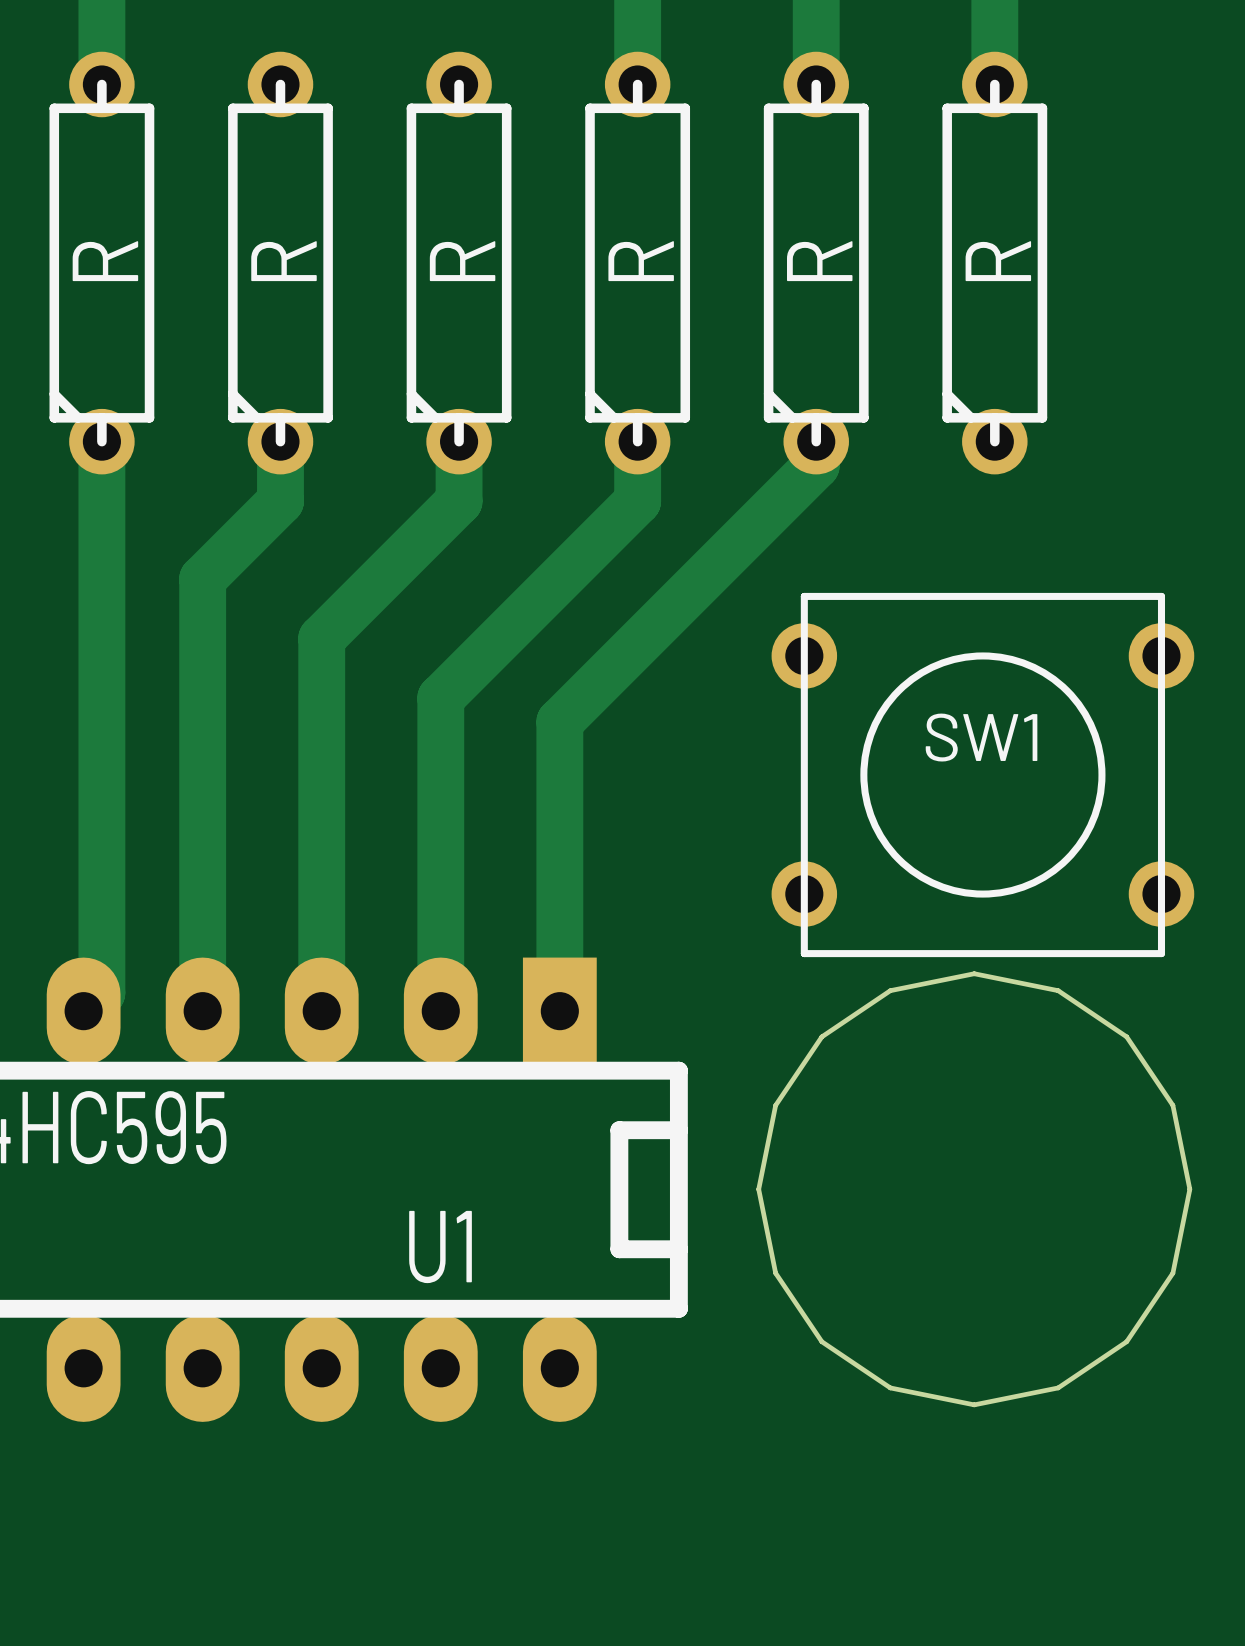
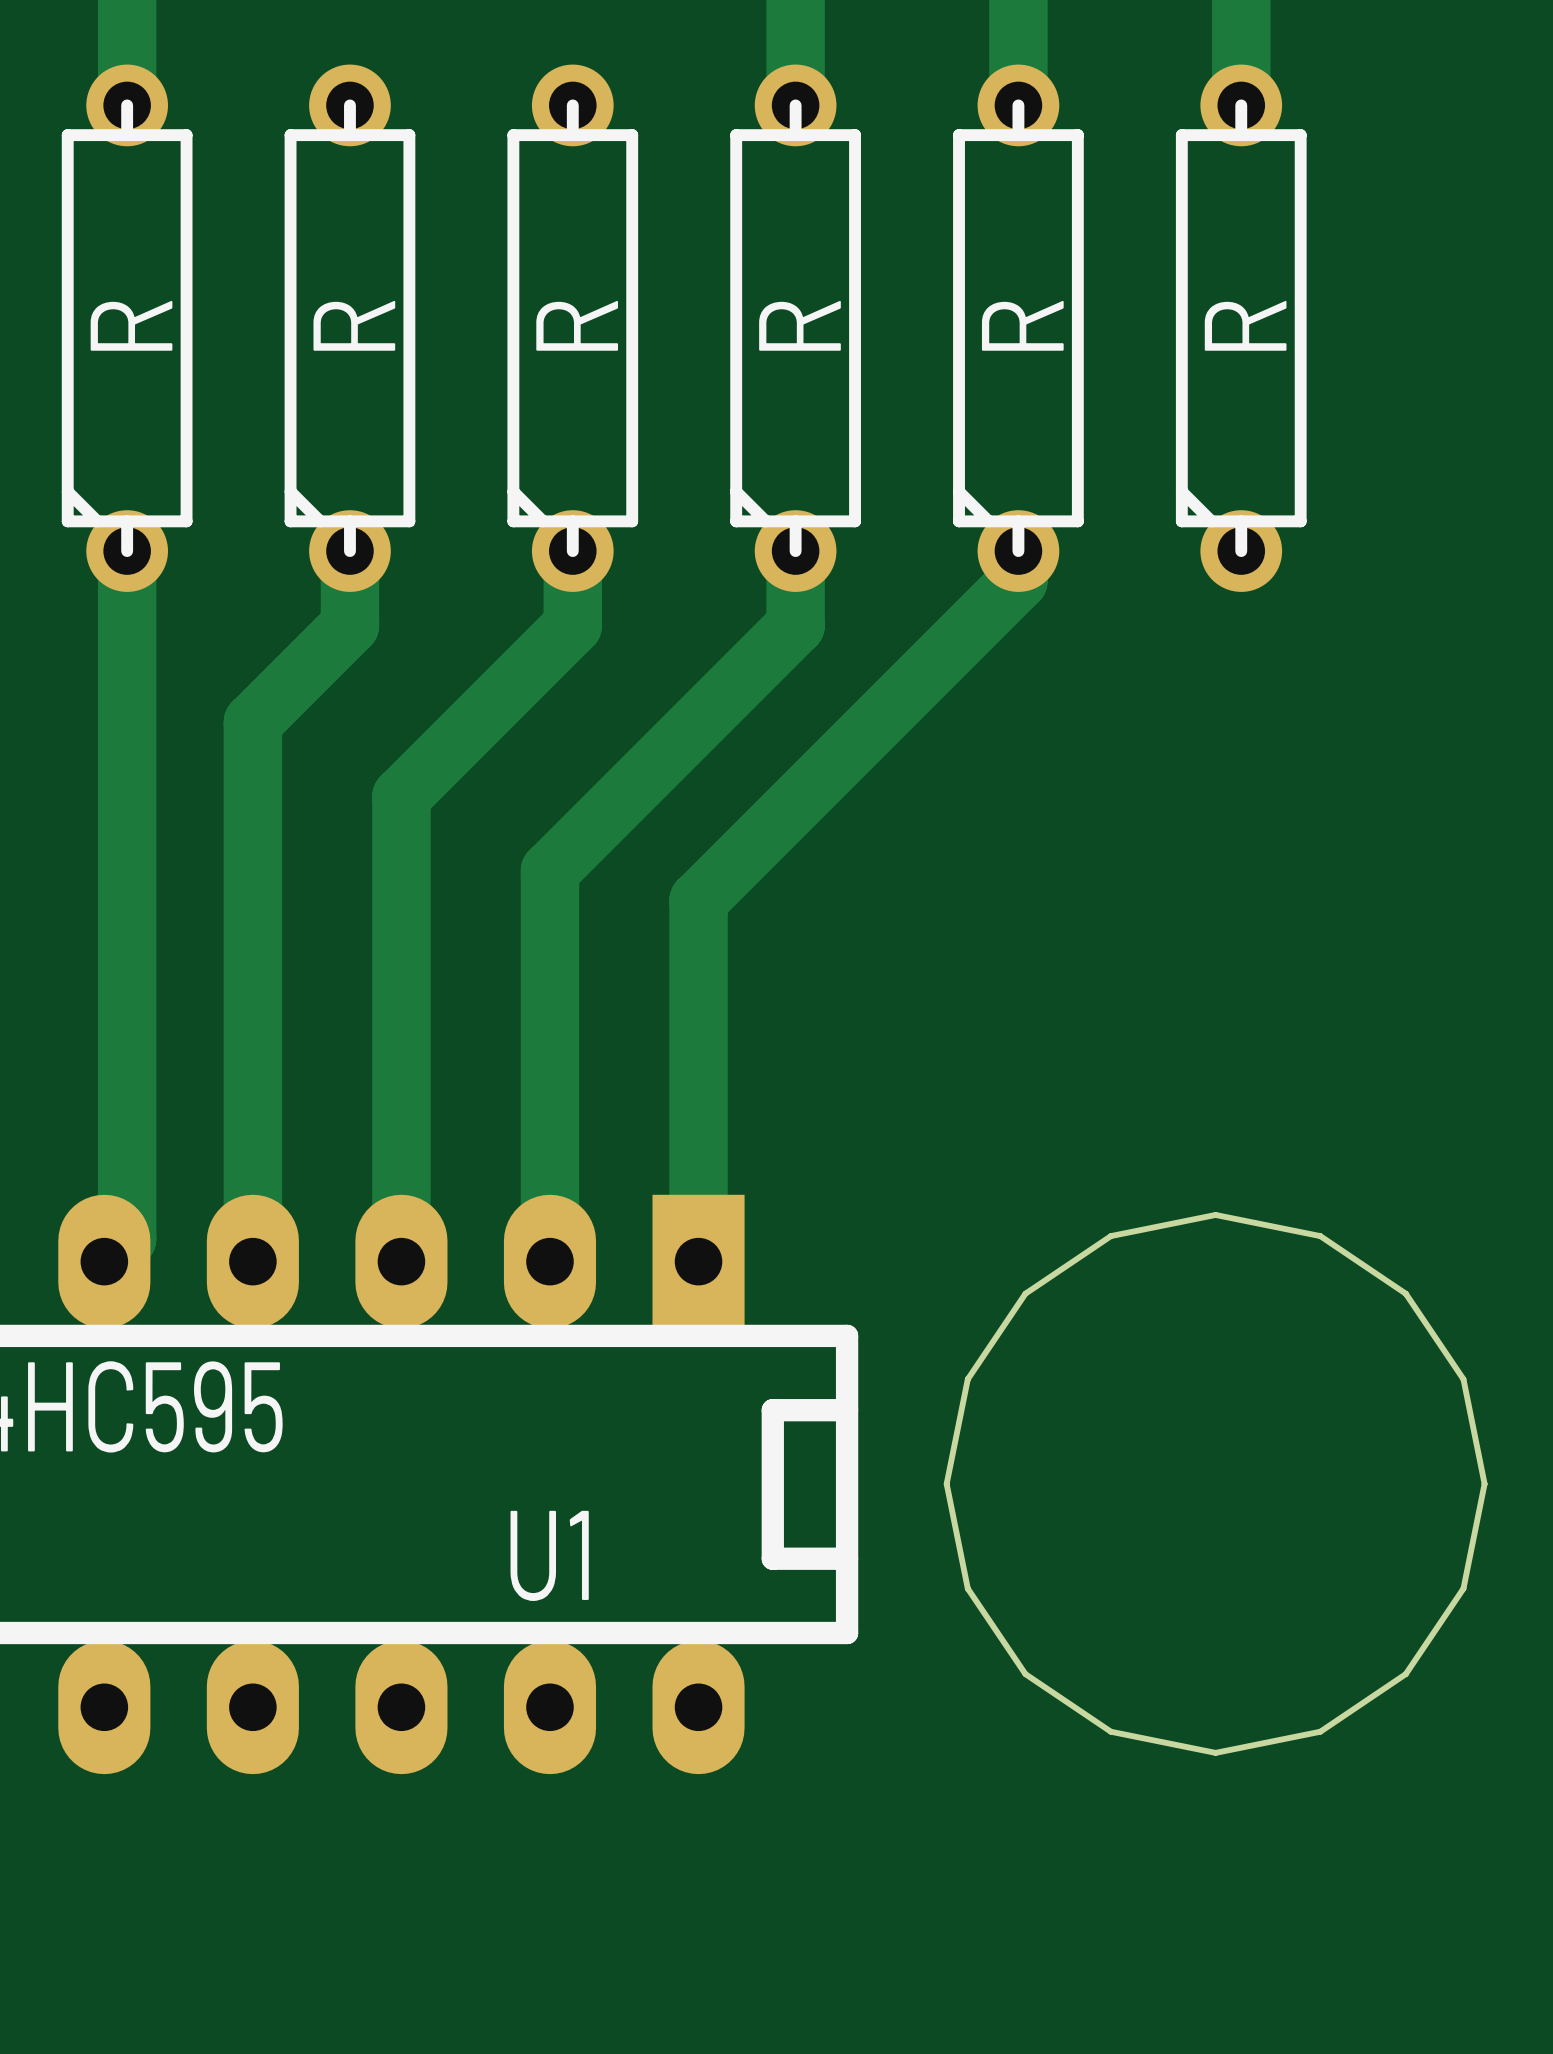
SW1: (982, 775) -> none

